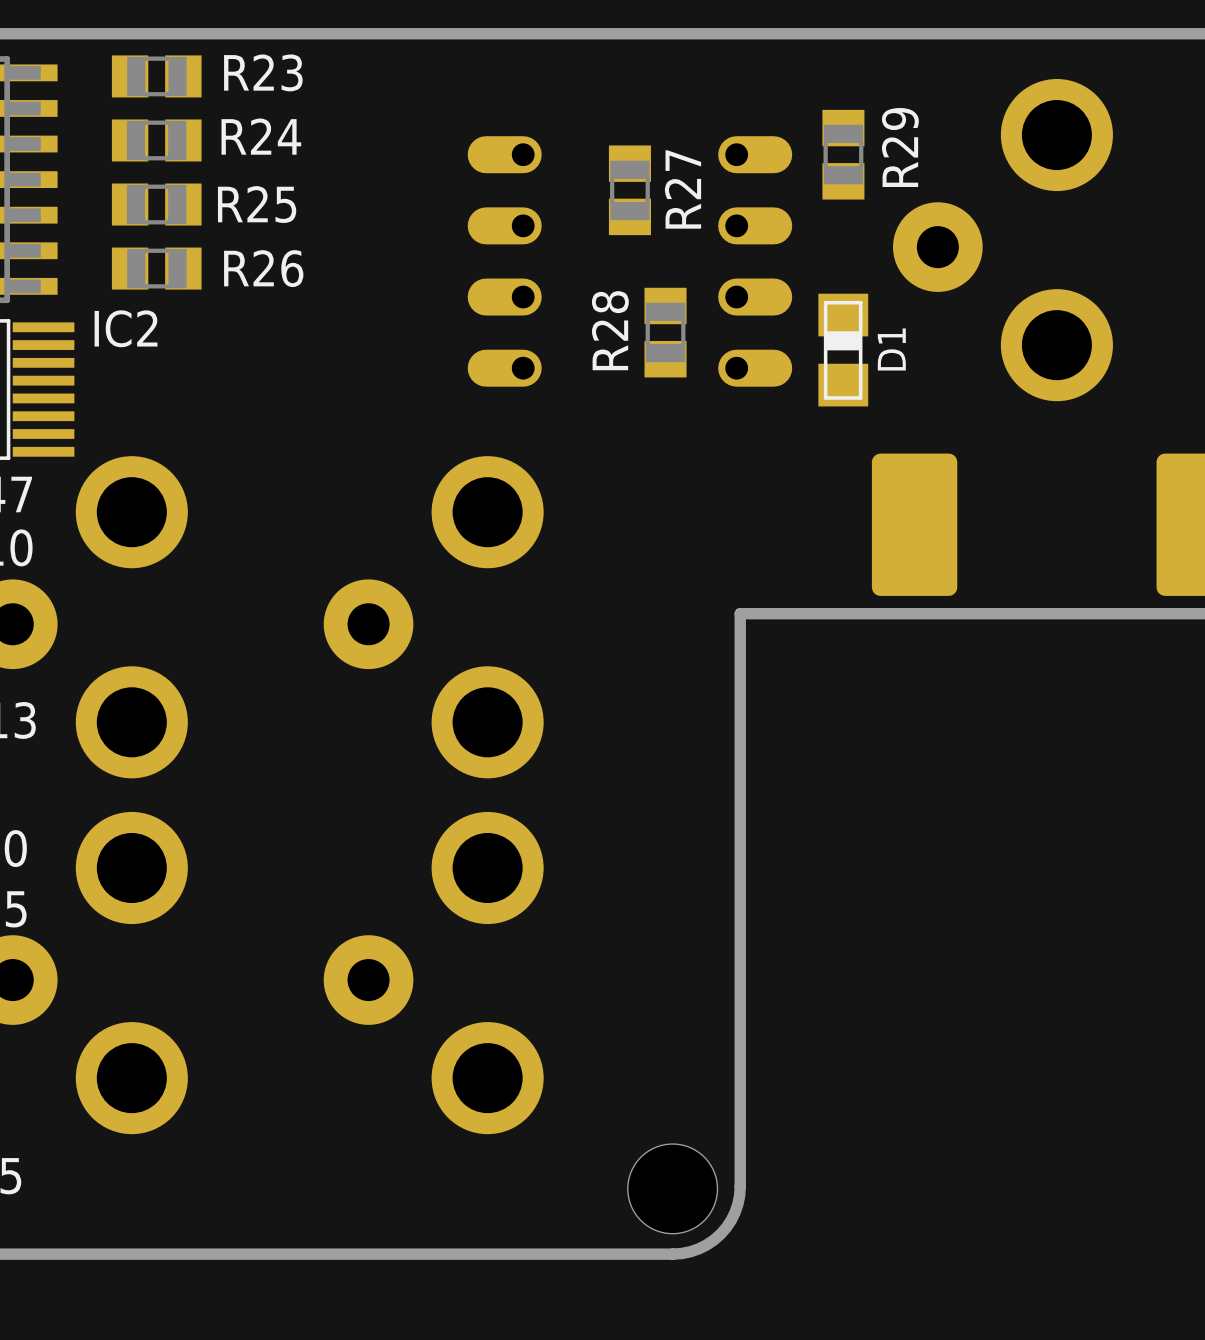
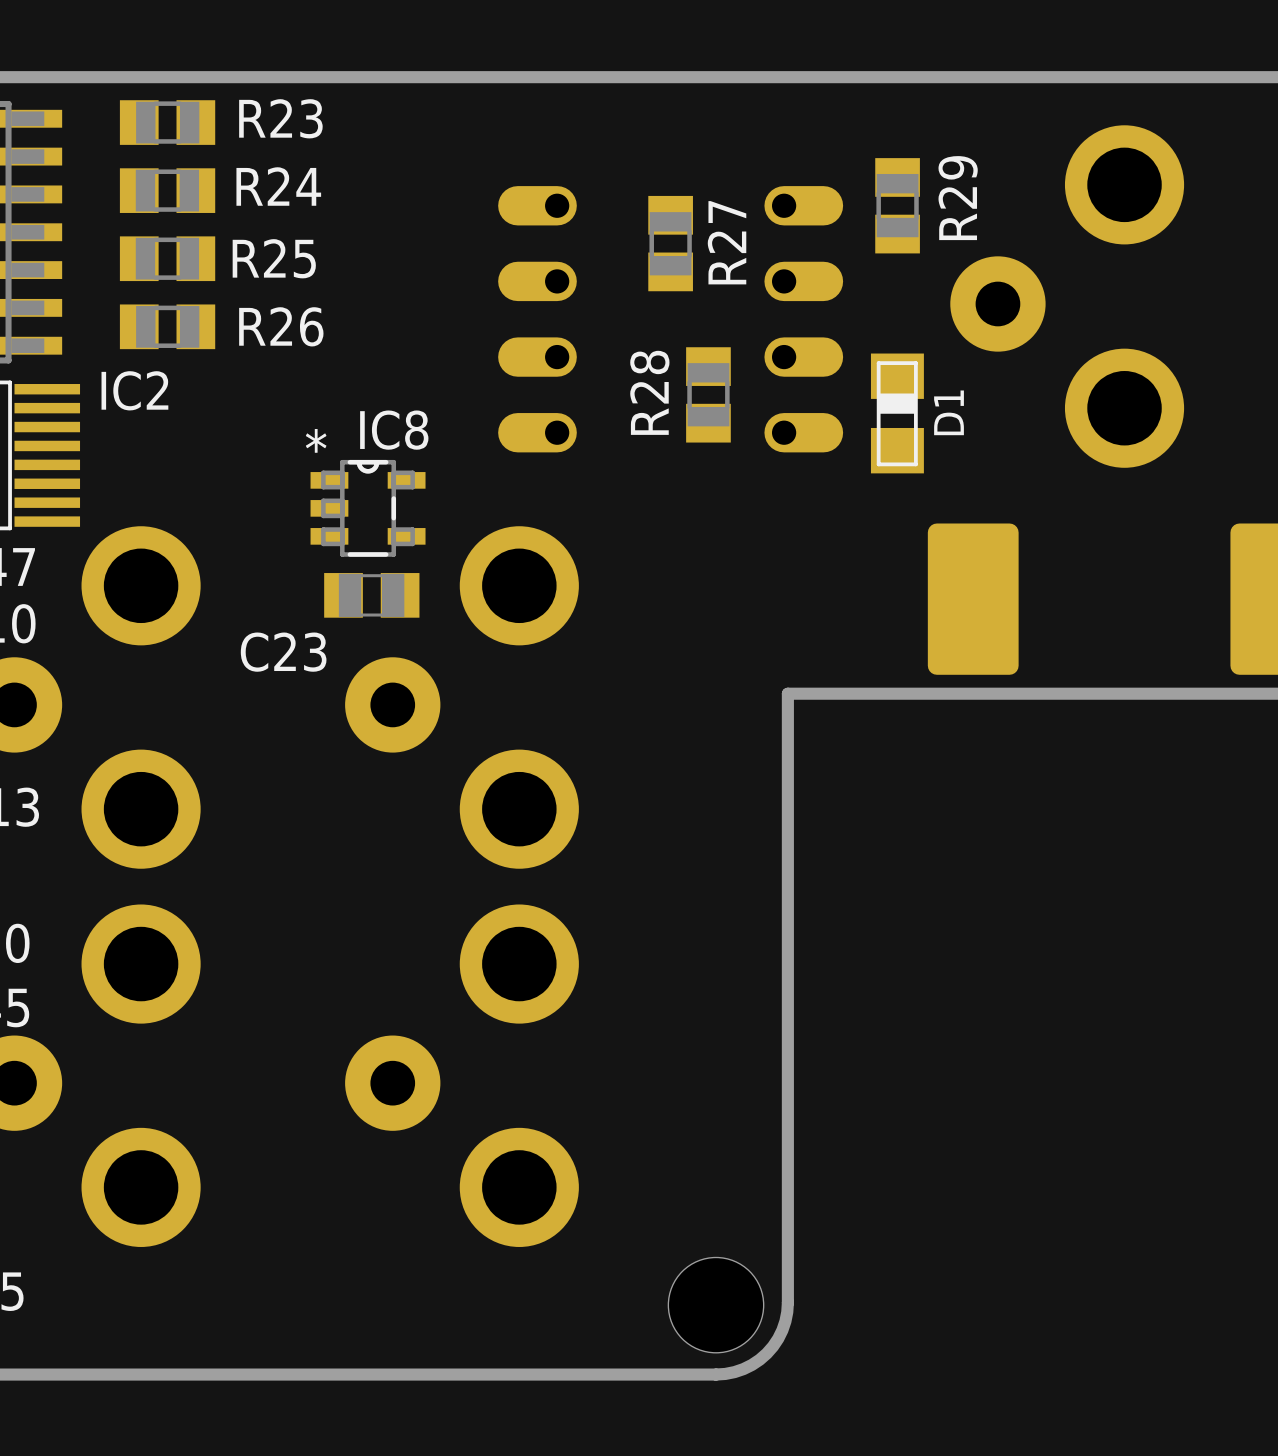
IC8: none -> (368, 508)
C23: none -> (371, 595)

